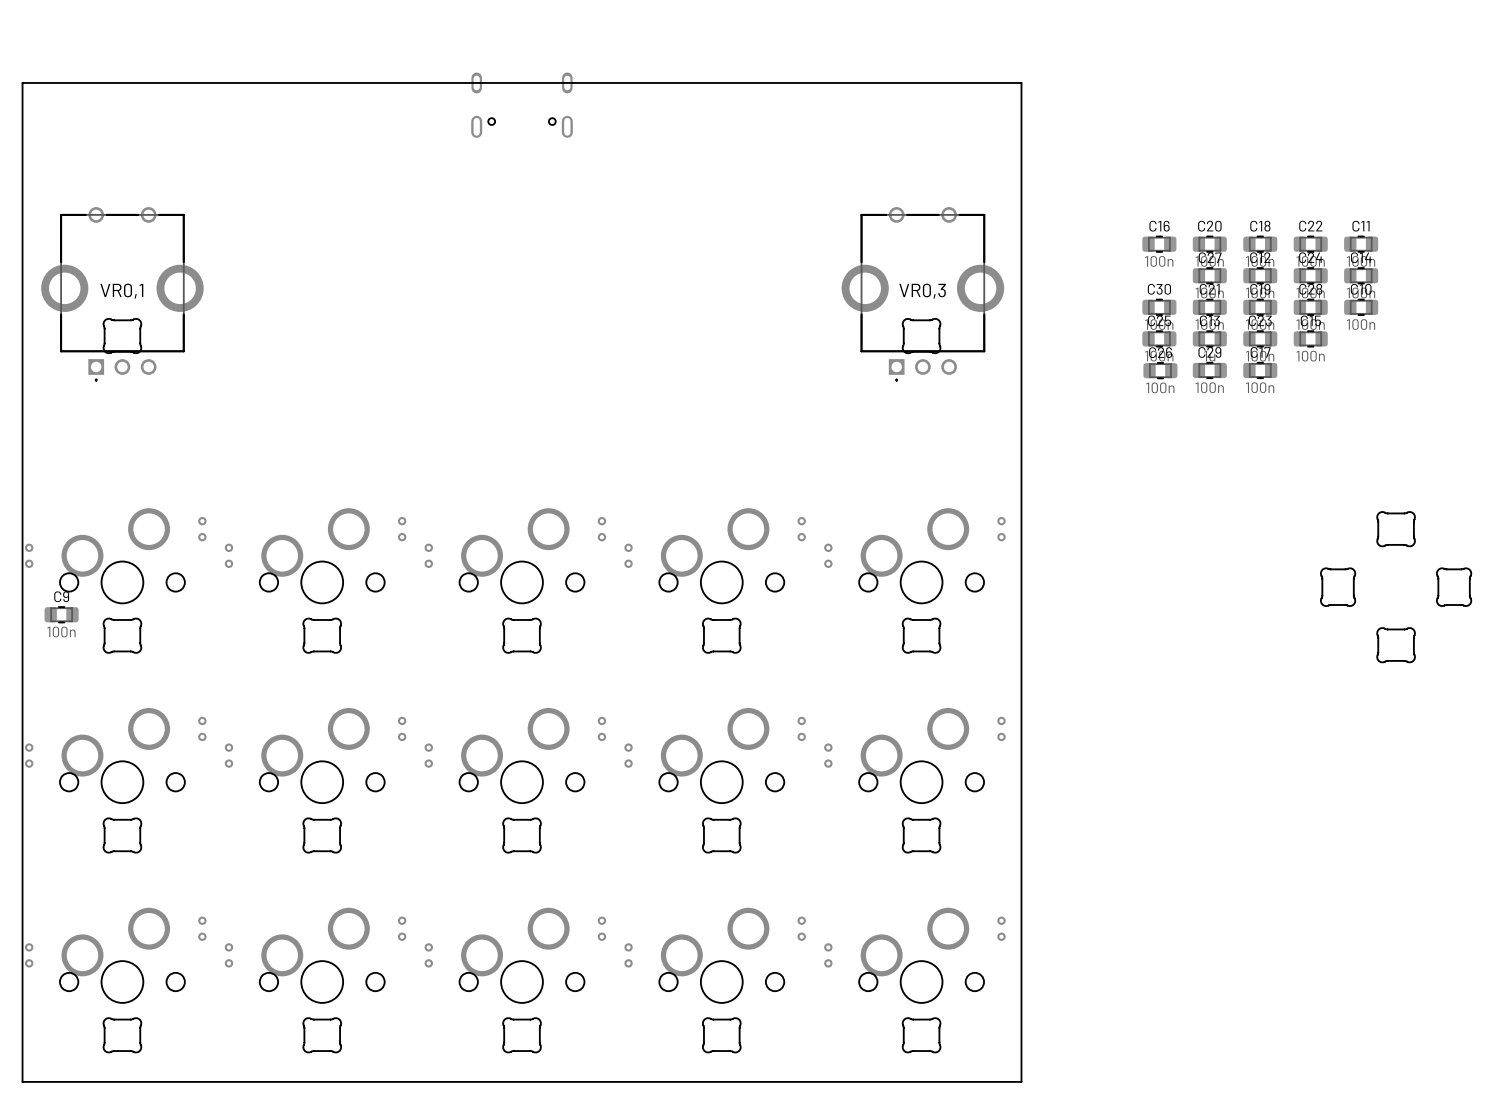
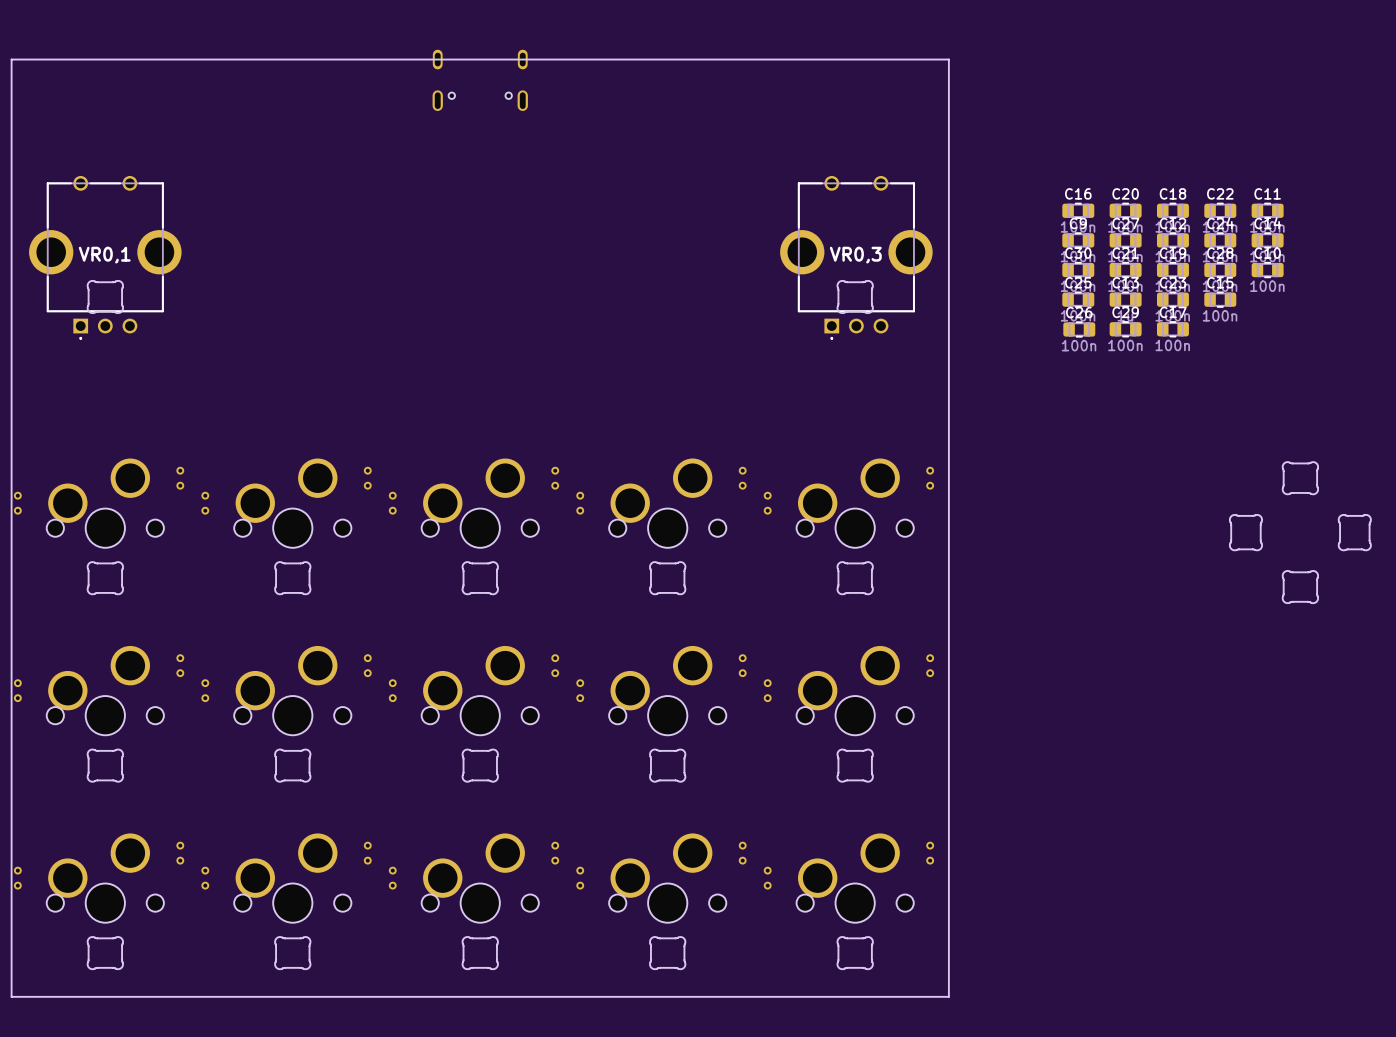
C9 position: (61, 614) -> (1078, 240)

